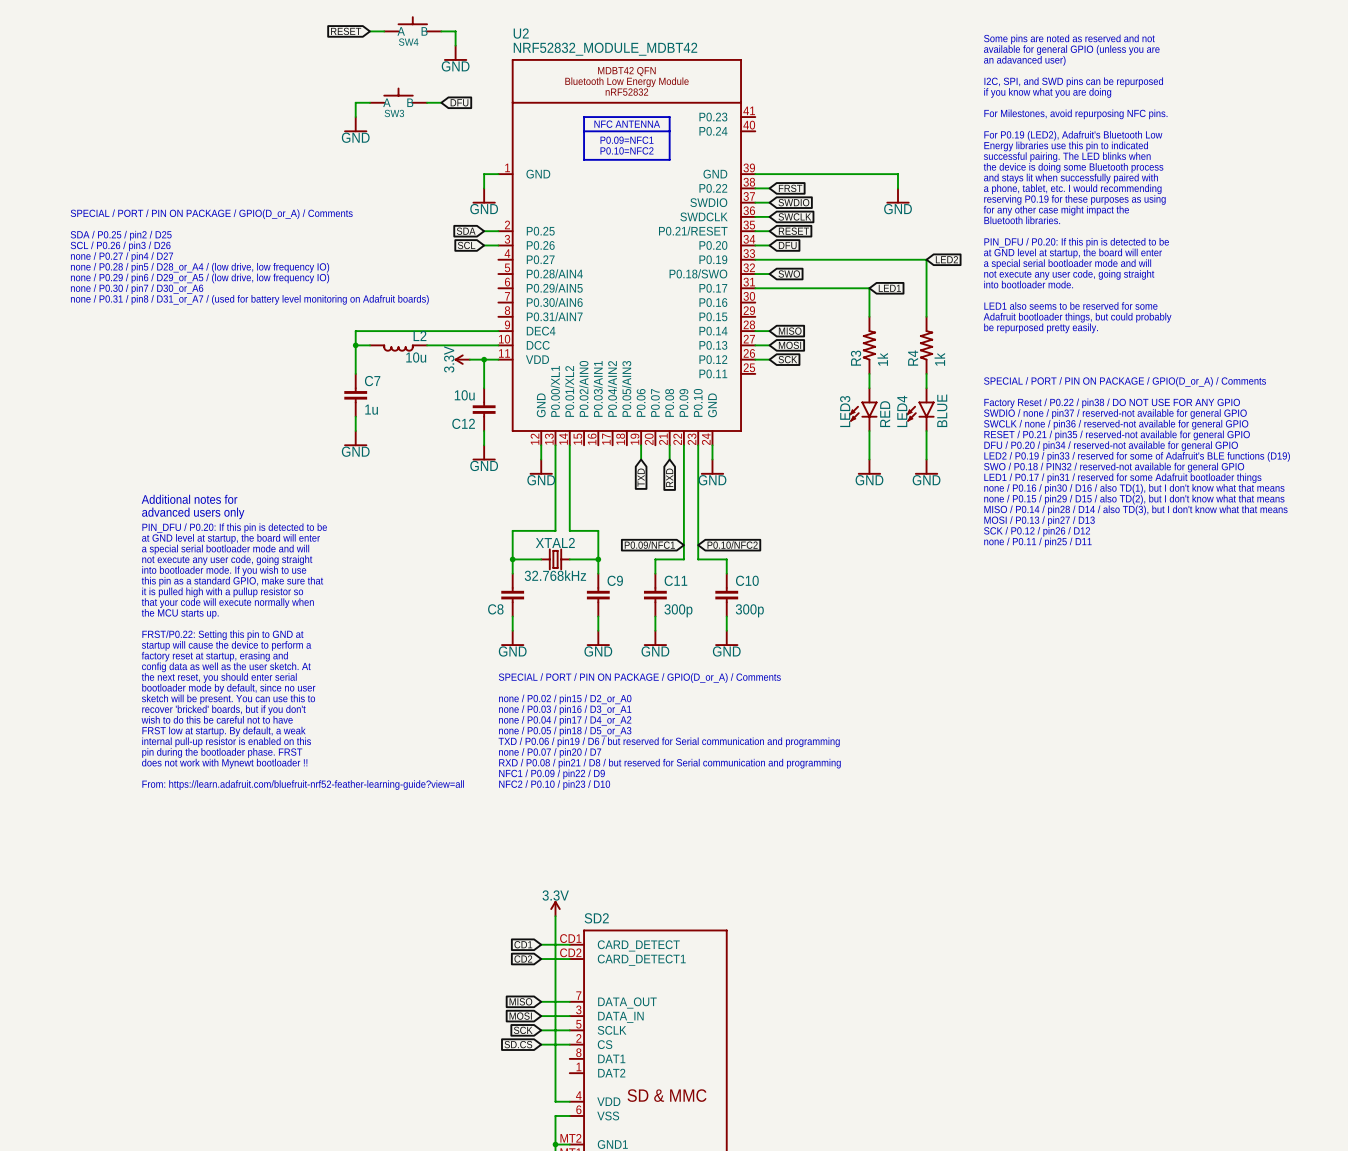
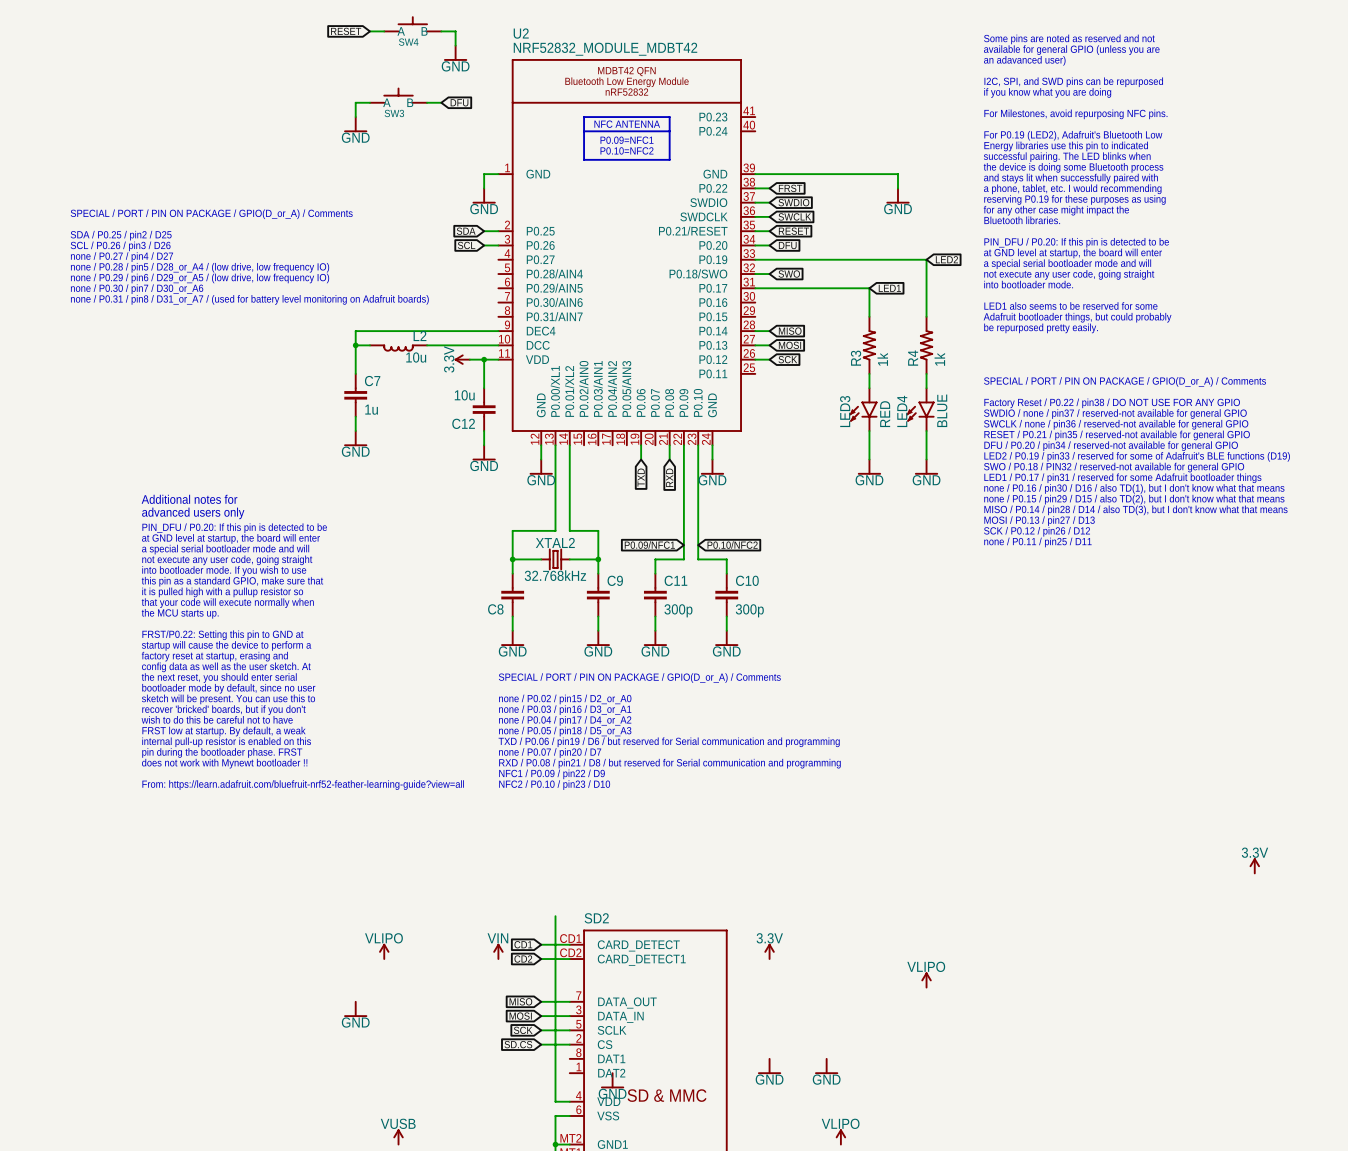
power symbol: none -> 3.3V (1254, 865)
power symbol: 3.3V (555, 908) -> none
power symbol: none -> VLIPO (384, 951)
power symbol: none -> VIN (498, 951)
power symbol: none -> 3.3V (769, 951)
power symbol: none -> VLIPO (926, 980)
power symbol: none -> GND (355, 1009)
power symbol: none -> GND (769, 1066)
power symbol: none -> GND (826, 1066)
power symbol: none -> GND (612, 1080)
power symbol: none -> VUSB (398, 1137)
power symbol: none -> VLIPO (840, 1137)

